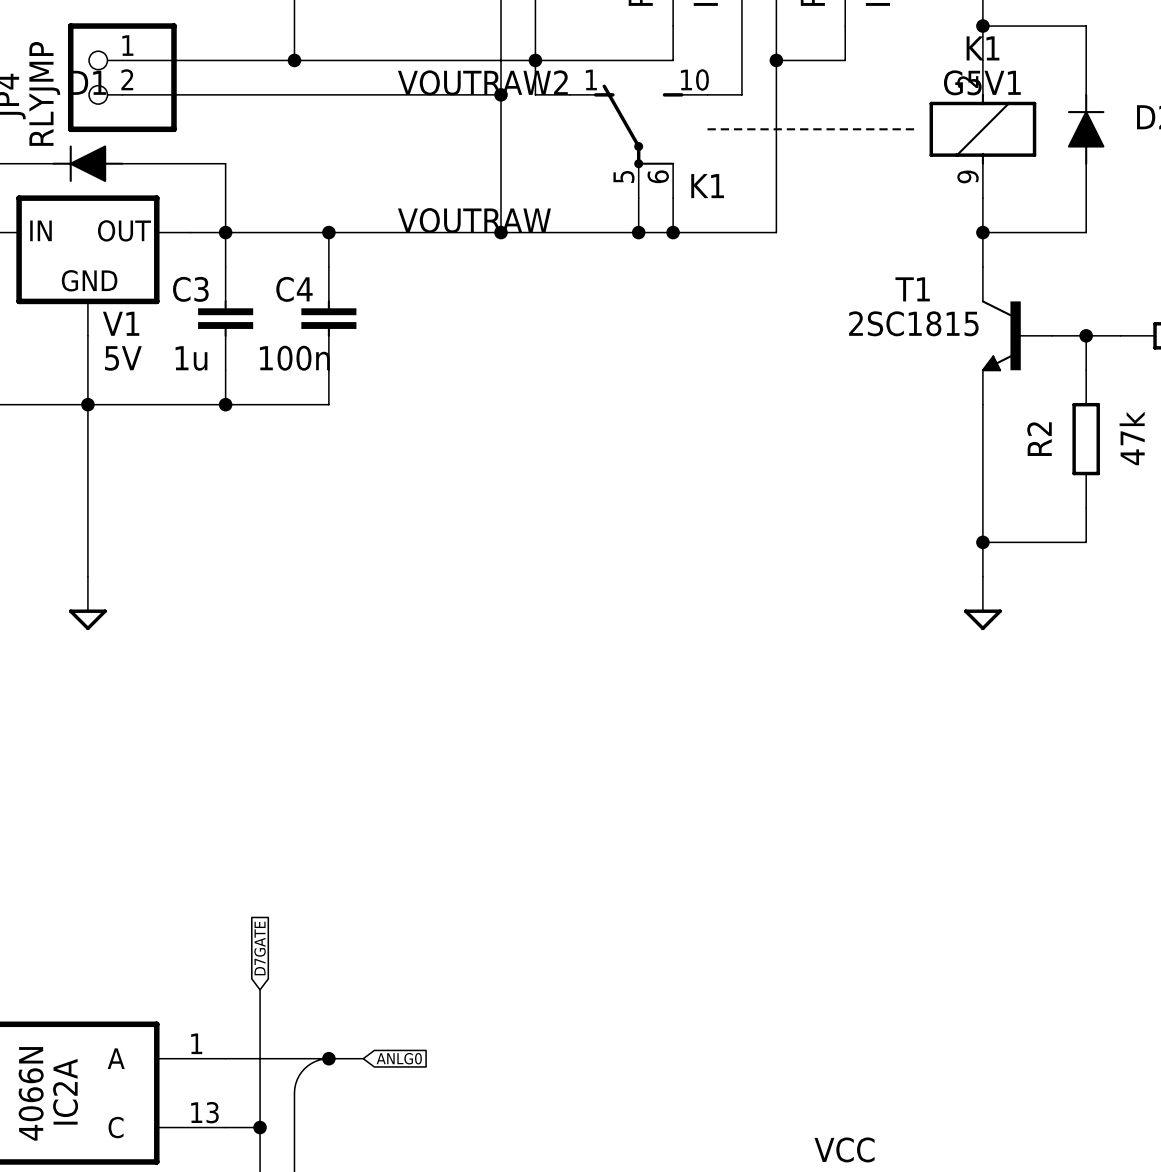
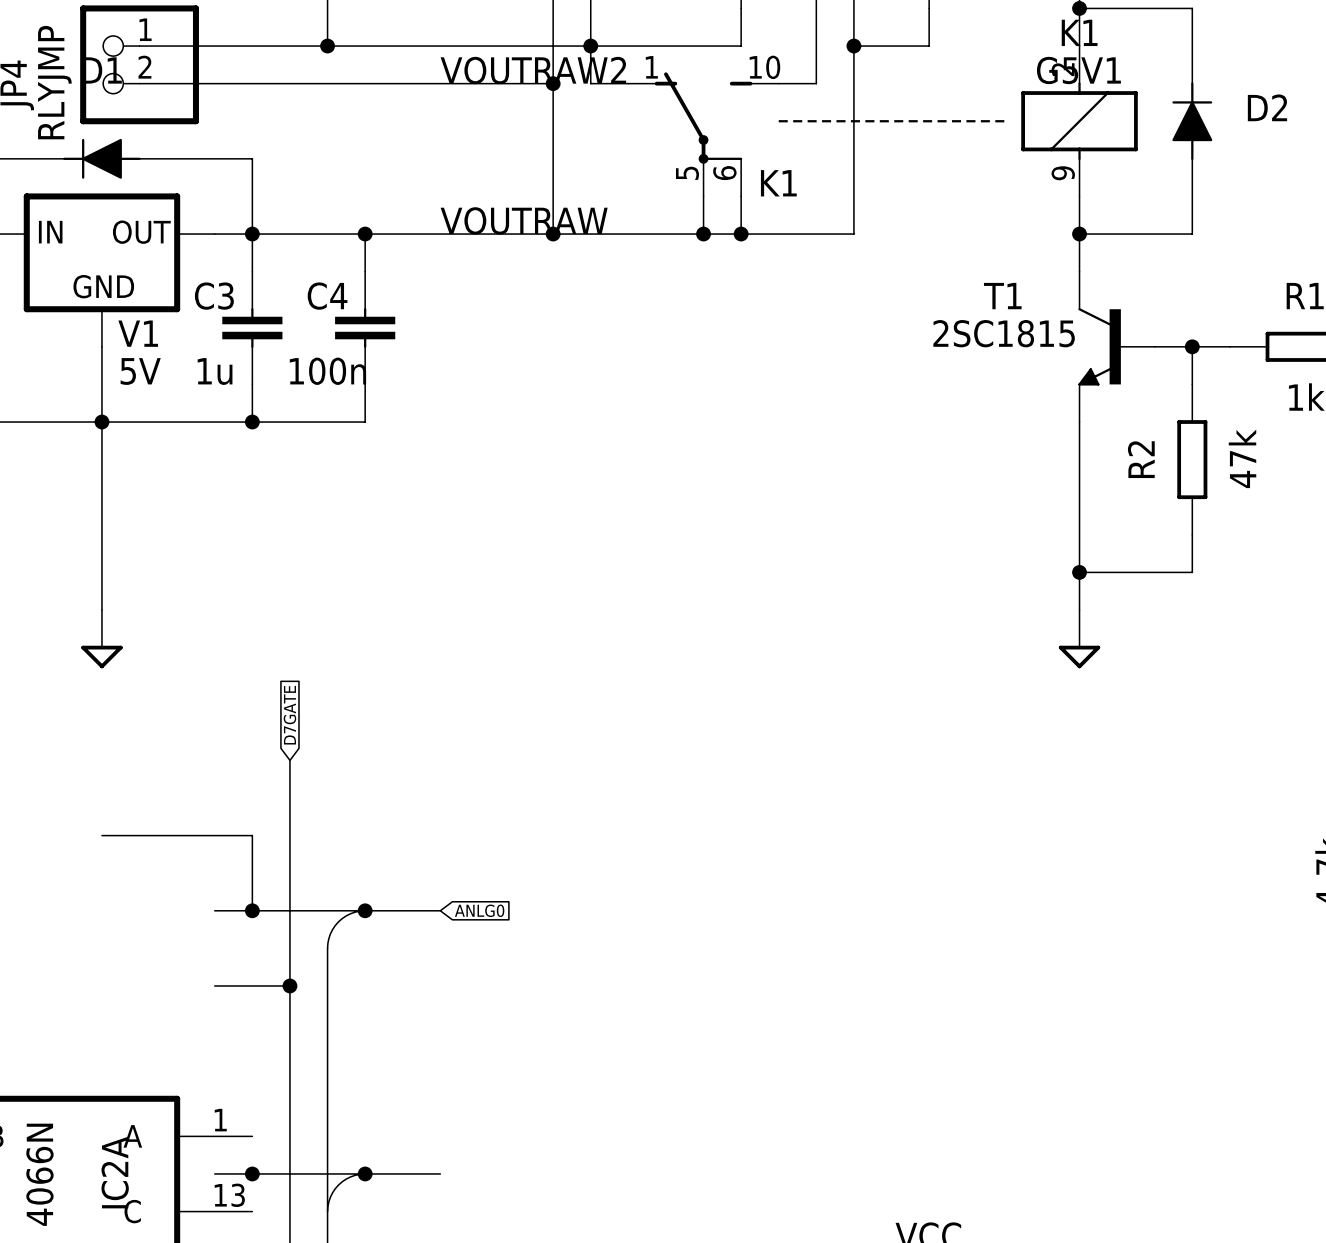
wire: none -> (289, 760) (289, 1061)
wire: none -> (101, 835) (252, 835) (252, 910)
wire: none -> (214, 910) (440, 910)
junction: none -> (252, 910)
wire: none -> (365, 910) (350, 913) (338, 921) (330, 934) (327, 948)
junction: none -> (365, 910)
bus: none -> (327, 948) (327, 1173)
wire: none -> (214, 985) (289, 985)
junction: none -> (289, 985)
global label position: D7GATE (260, 948) -> D7GATE (289, 715)
wire: (225, 1058) (363, 1058) -> none
wire: (328, 1058) (315, 1061) (304, 1068) (297, 1079) (294, 1093) -> (365, 1173) (350, 1176) (338, 1184) (330, 1197) (327, 1211)
junction position: (328, 1058) -> (365, 1173)
global label position: ANLG0 (399, 1058) -> ANLG0 (479, 910)
IC2A name position: IC2A (65, 1091) -> IC2A (115, 1172)
wire: none -> (214, 1173) (440, 1173)
junction: none -> (252, 1173)
wire: (225, 1127) (260, 1127) -> none
junction: (260, 1127) -> none

